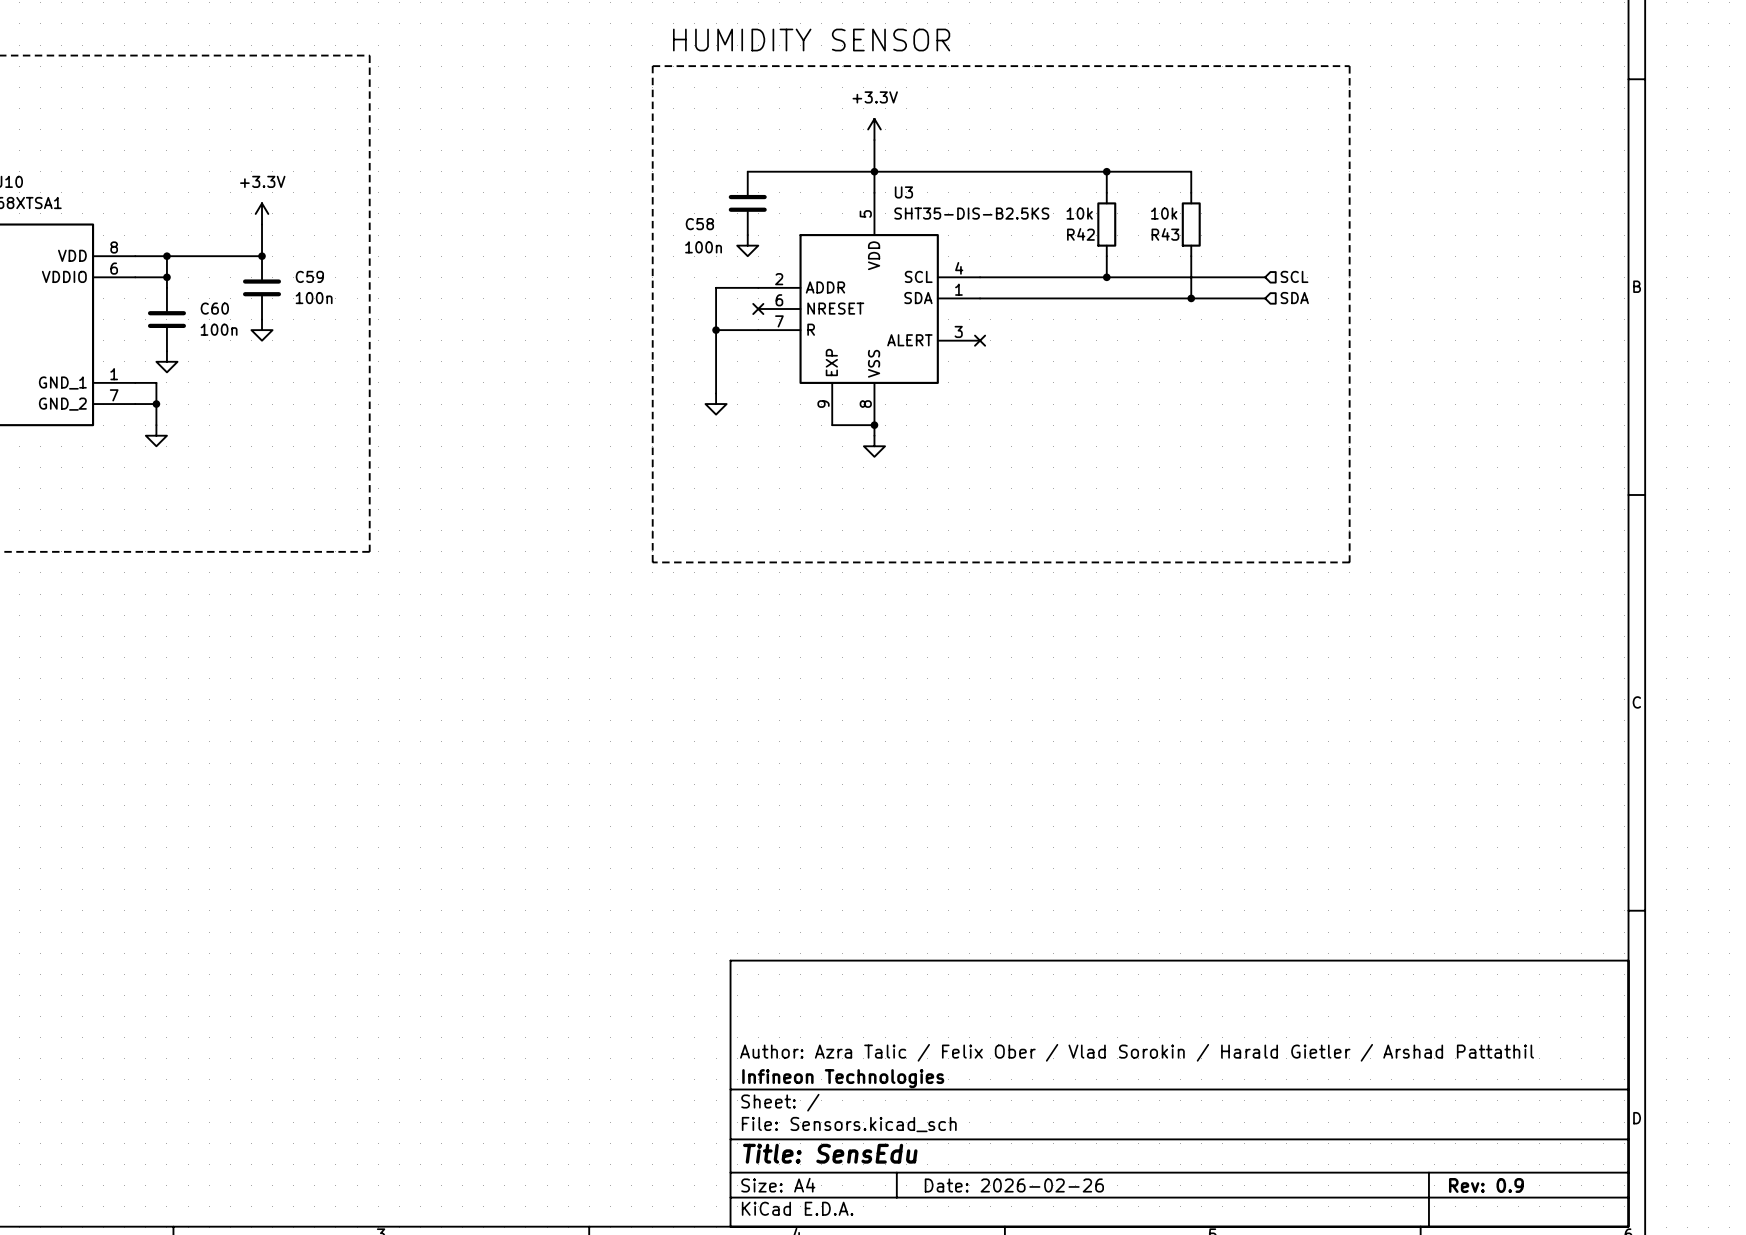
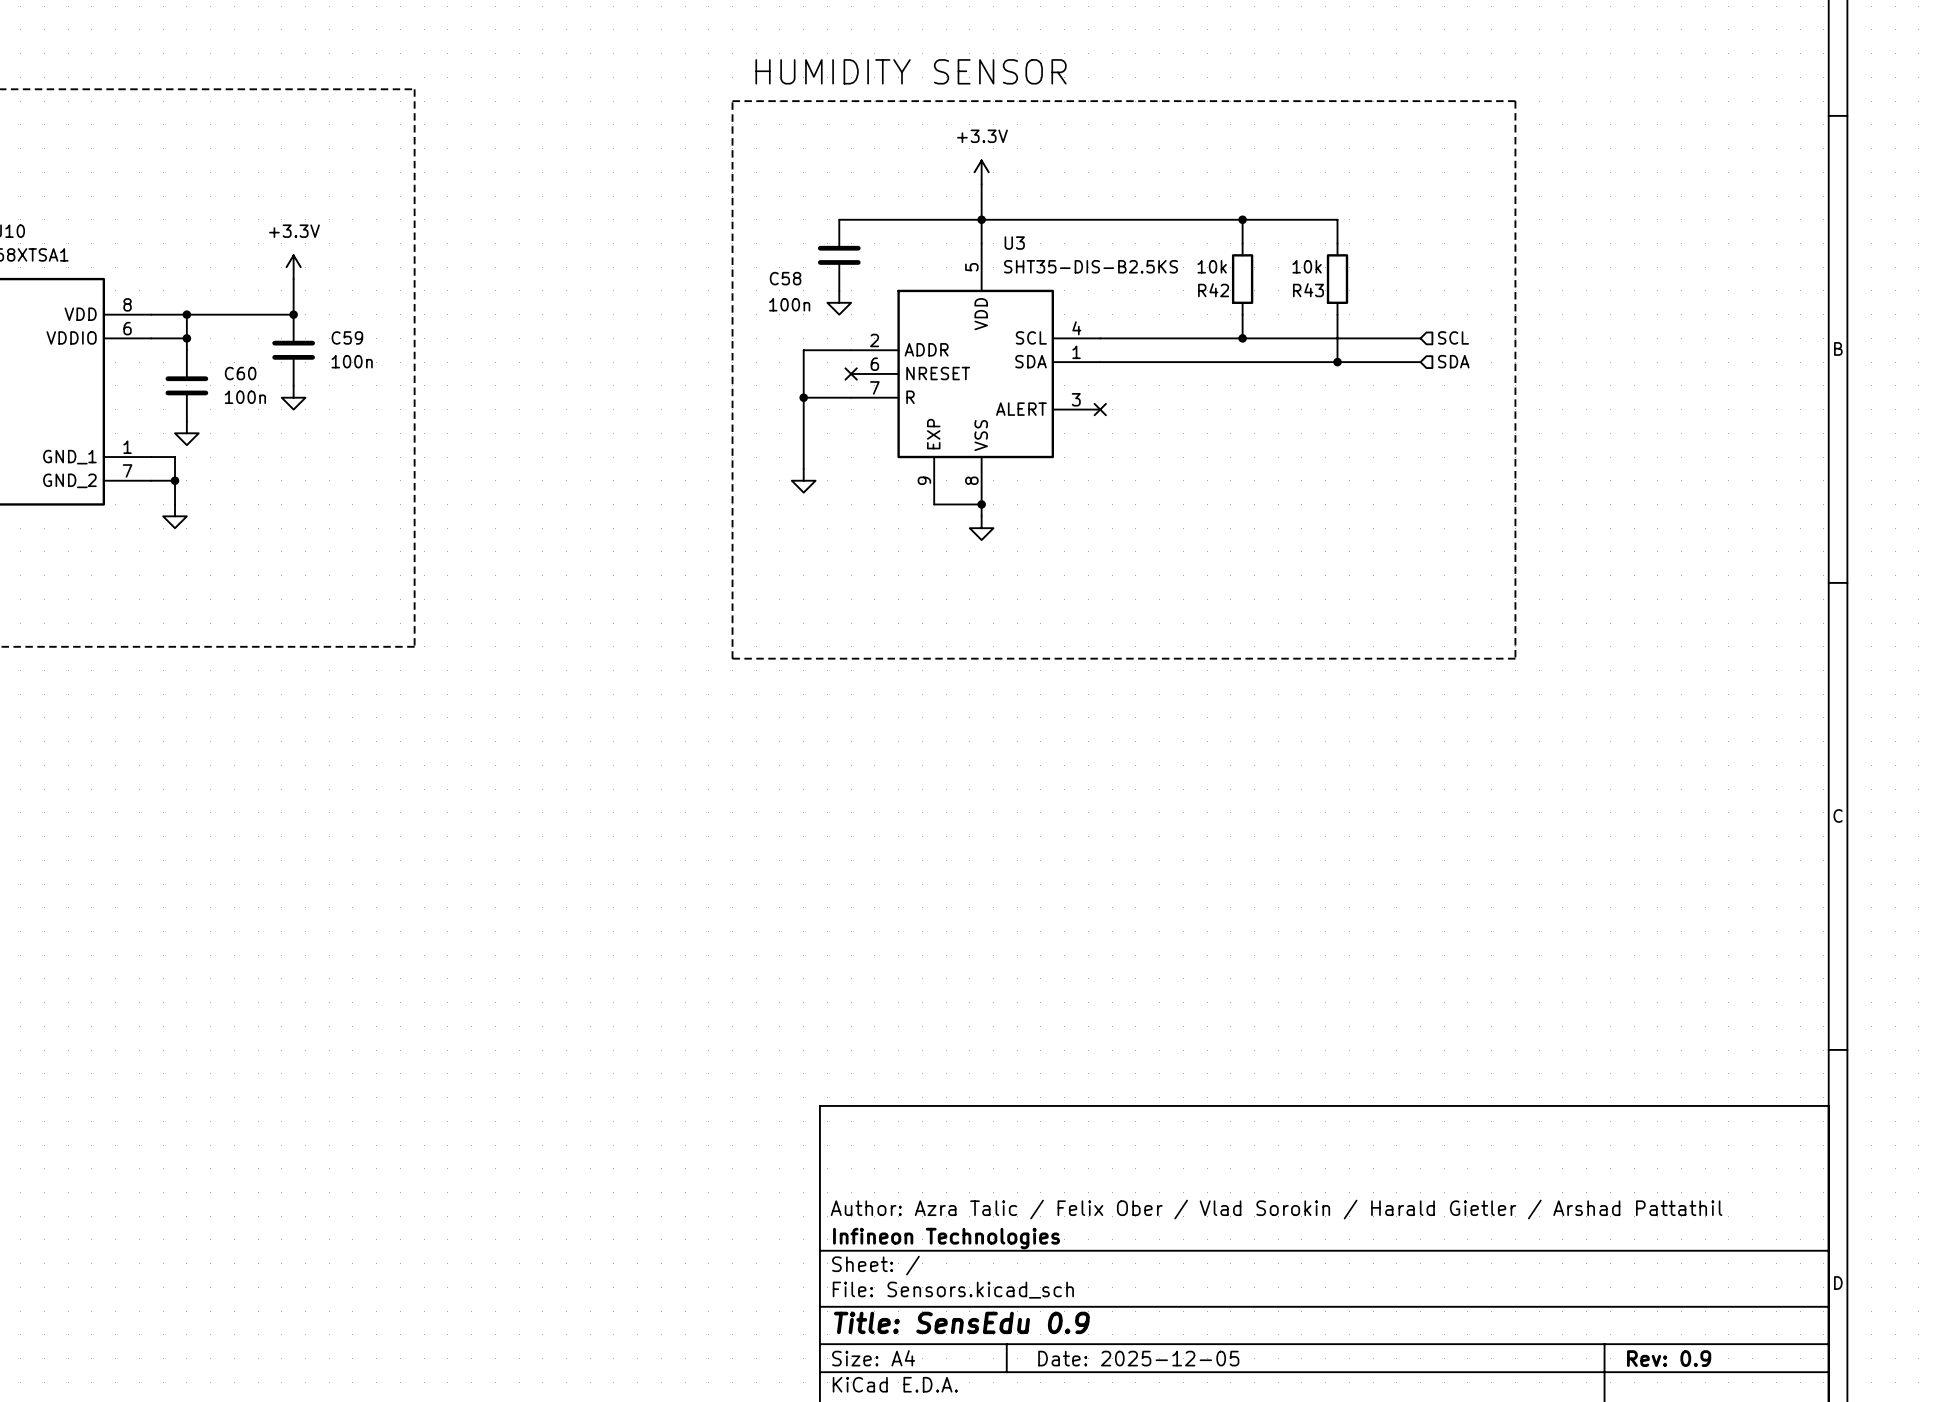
title block: Title: SensEdu (830, 1153) -> Title: SensEdu 0.9 (961, 1322)
title block: Date: 2026-02-26 (1014, 1185) -> Date: 2025-12-05 (1138, 1358)

